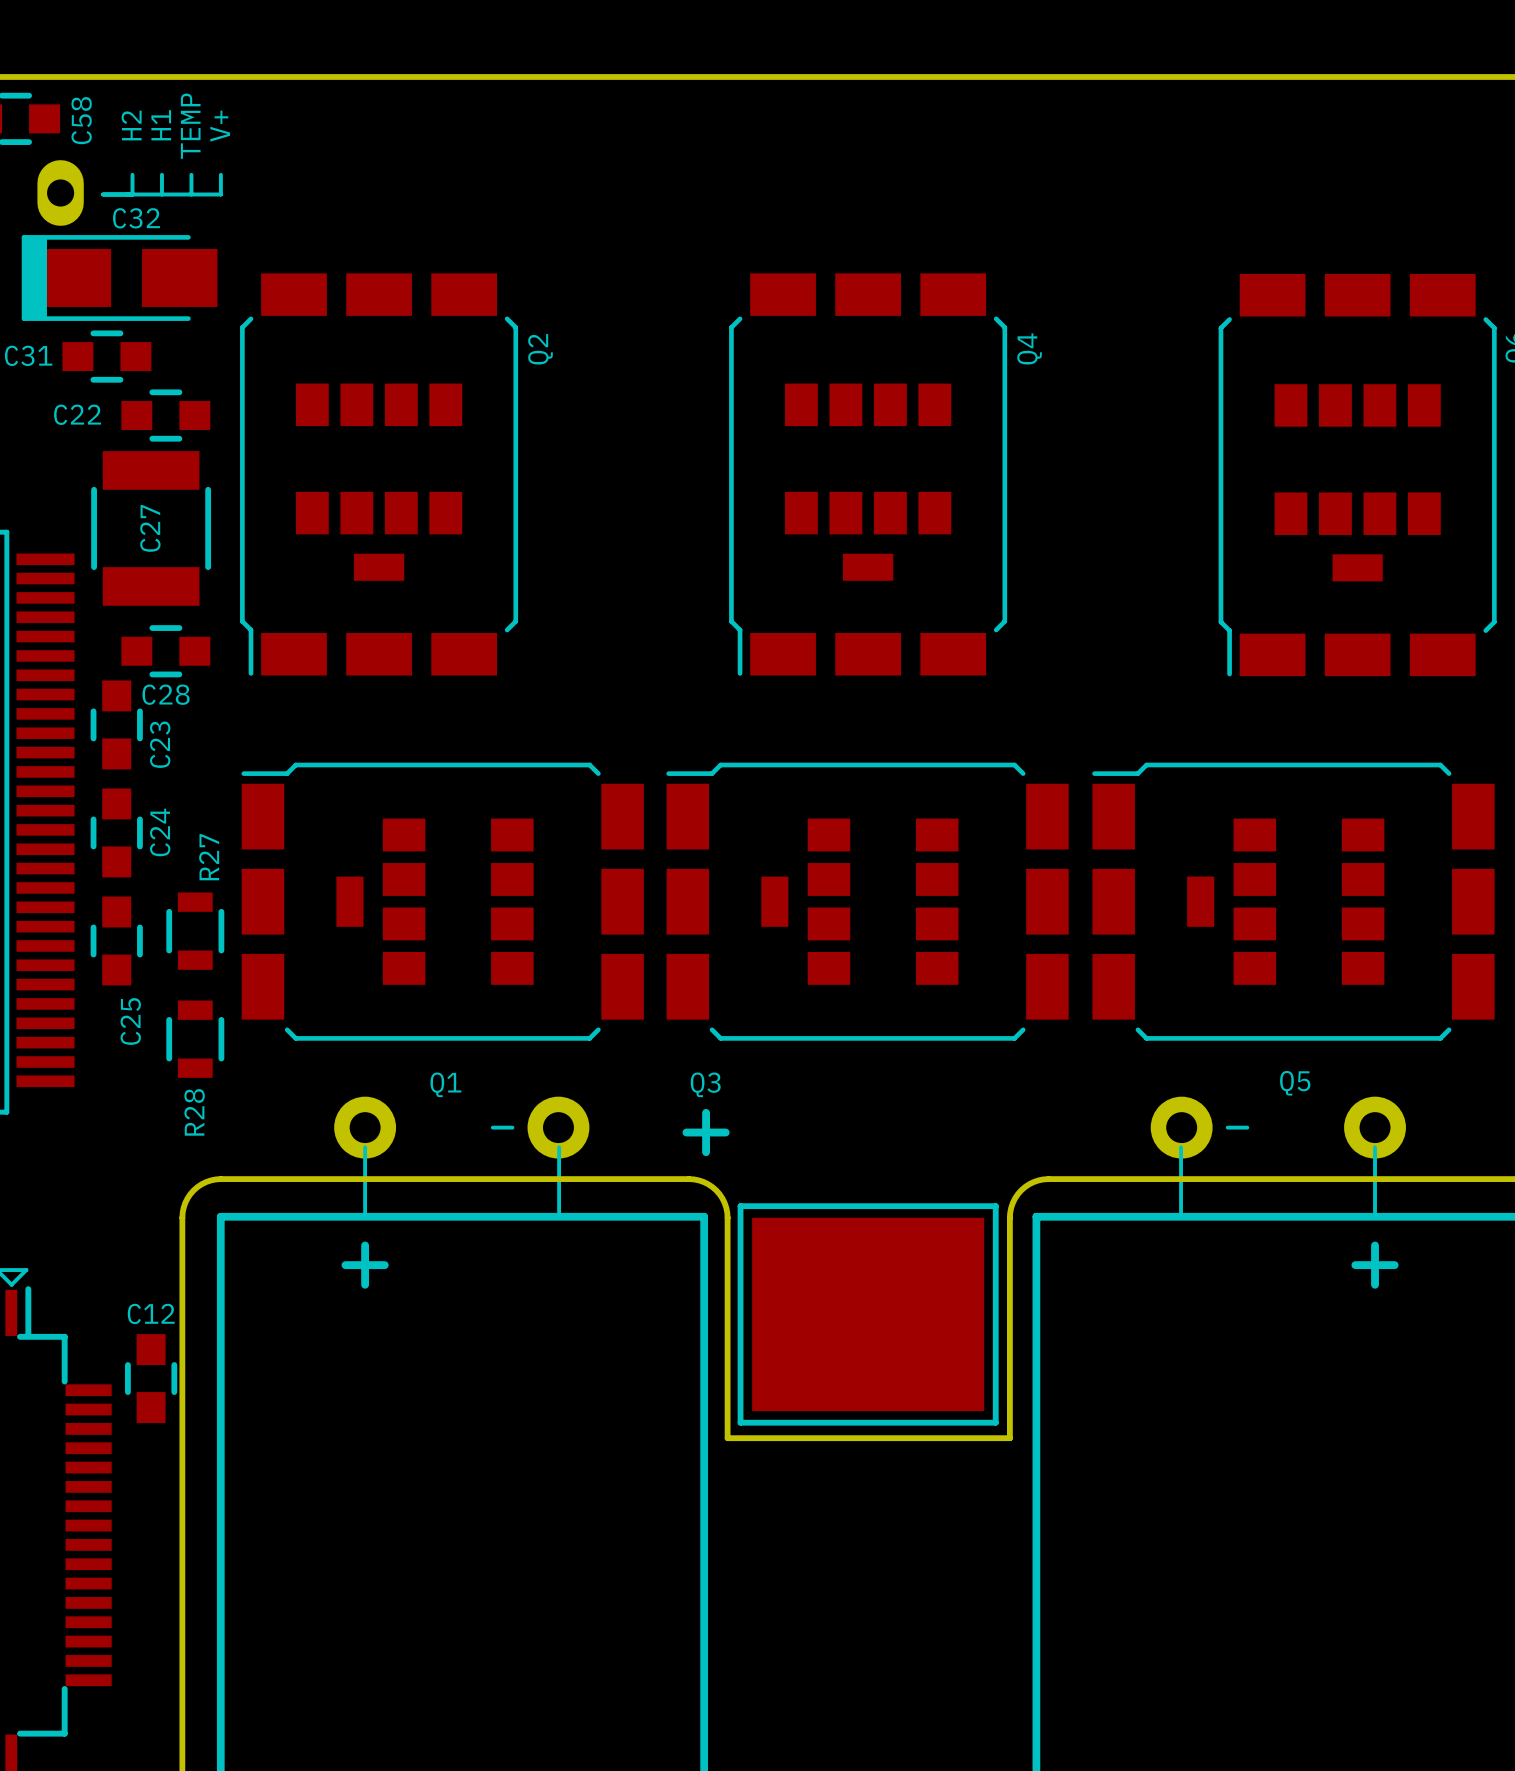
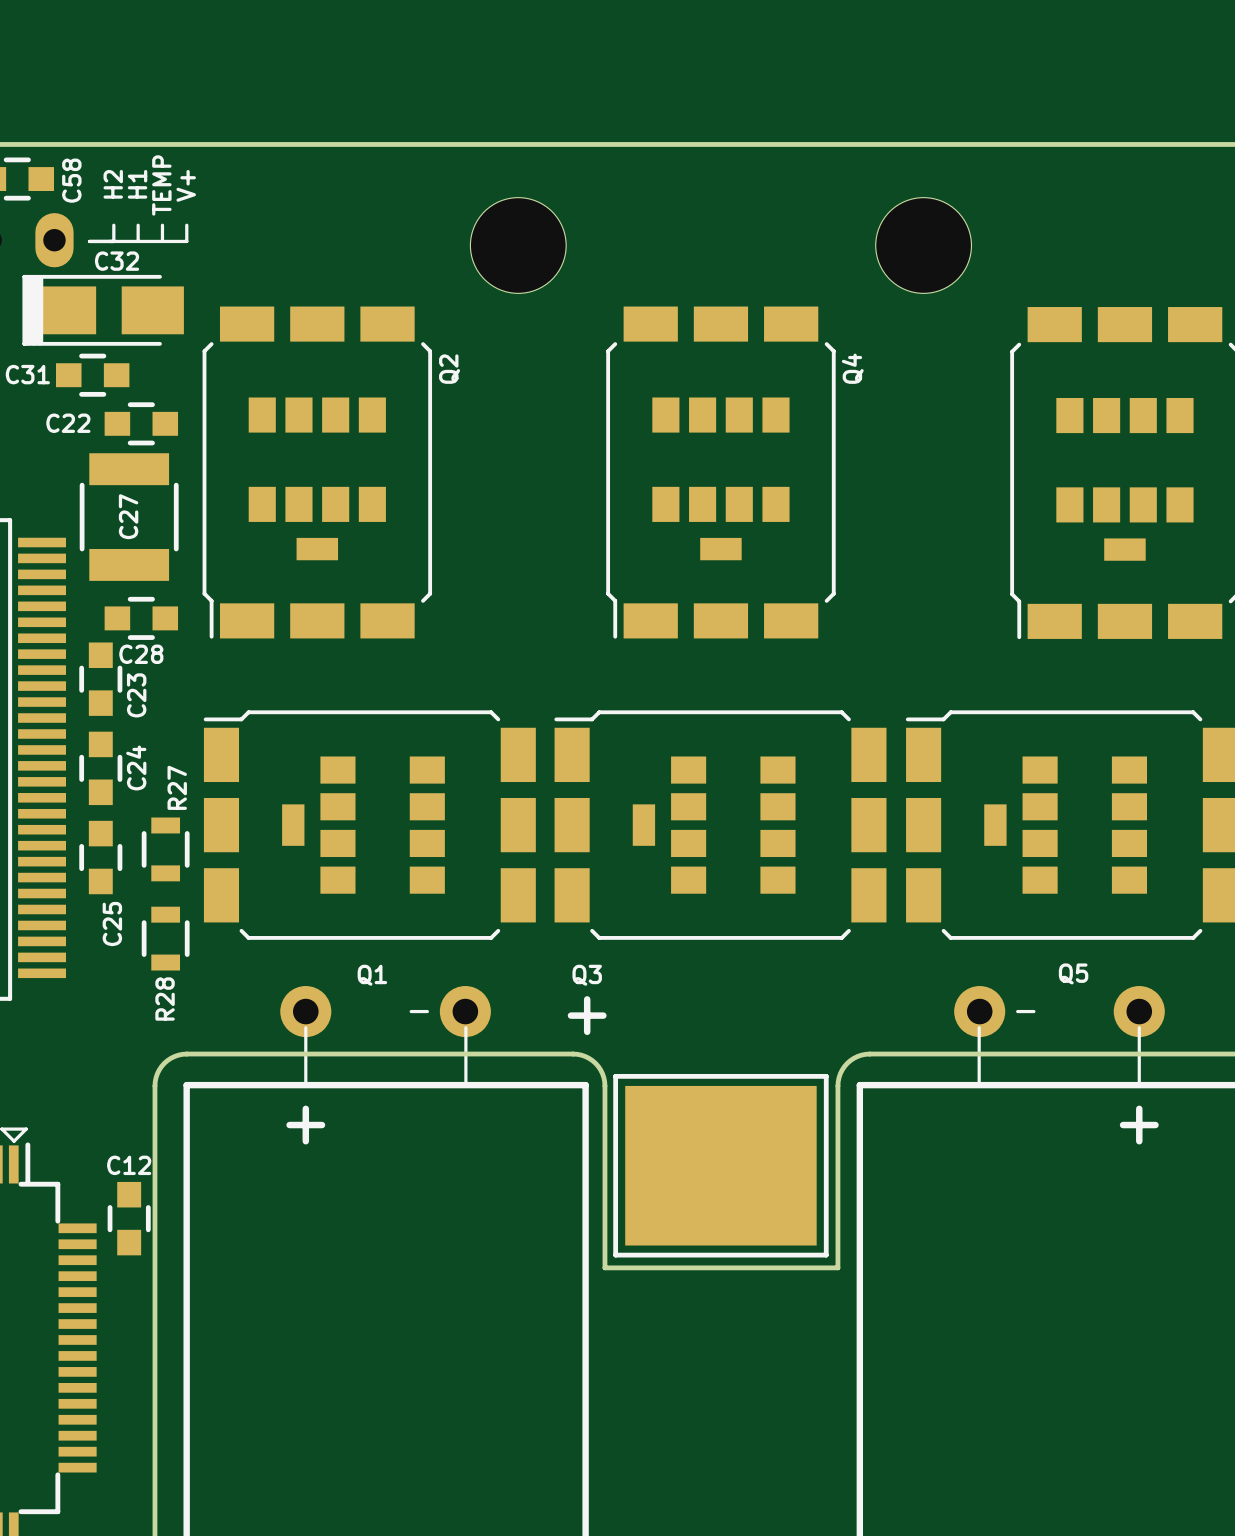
part: none -> (518, 245)
part: none -> (923, 245)

